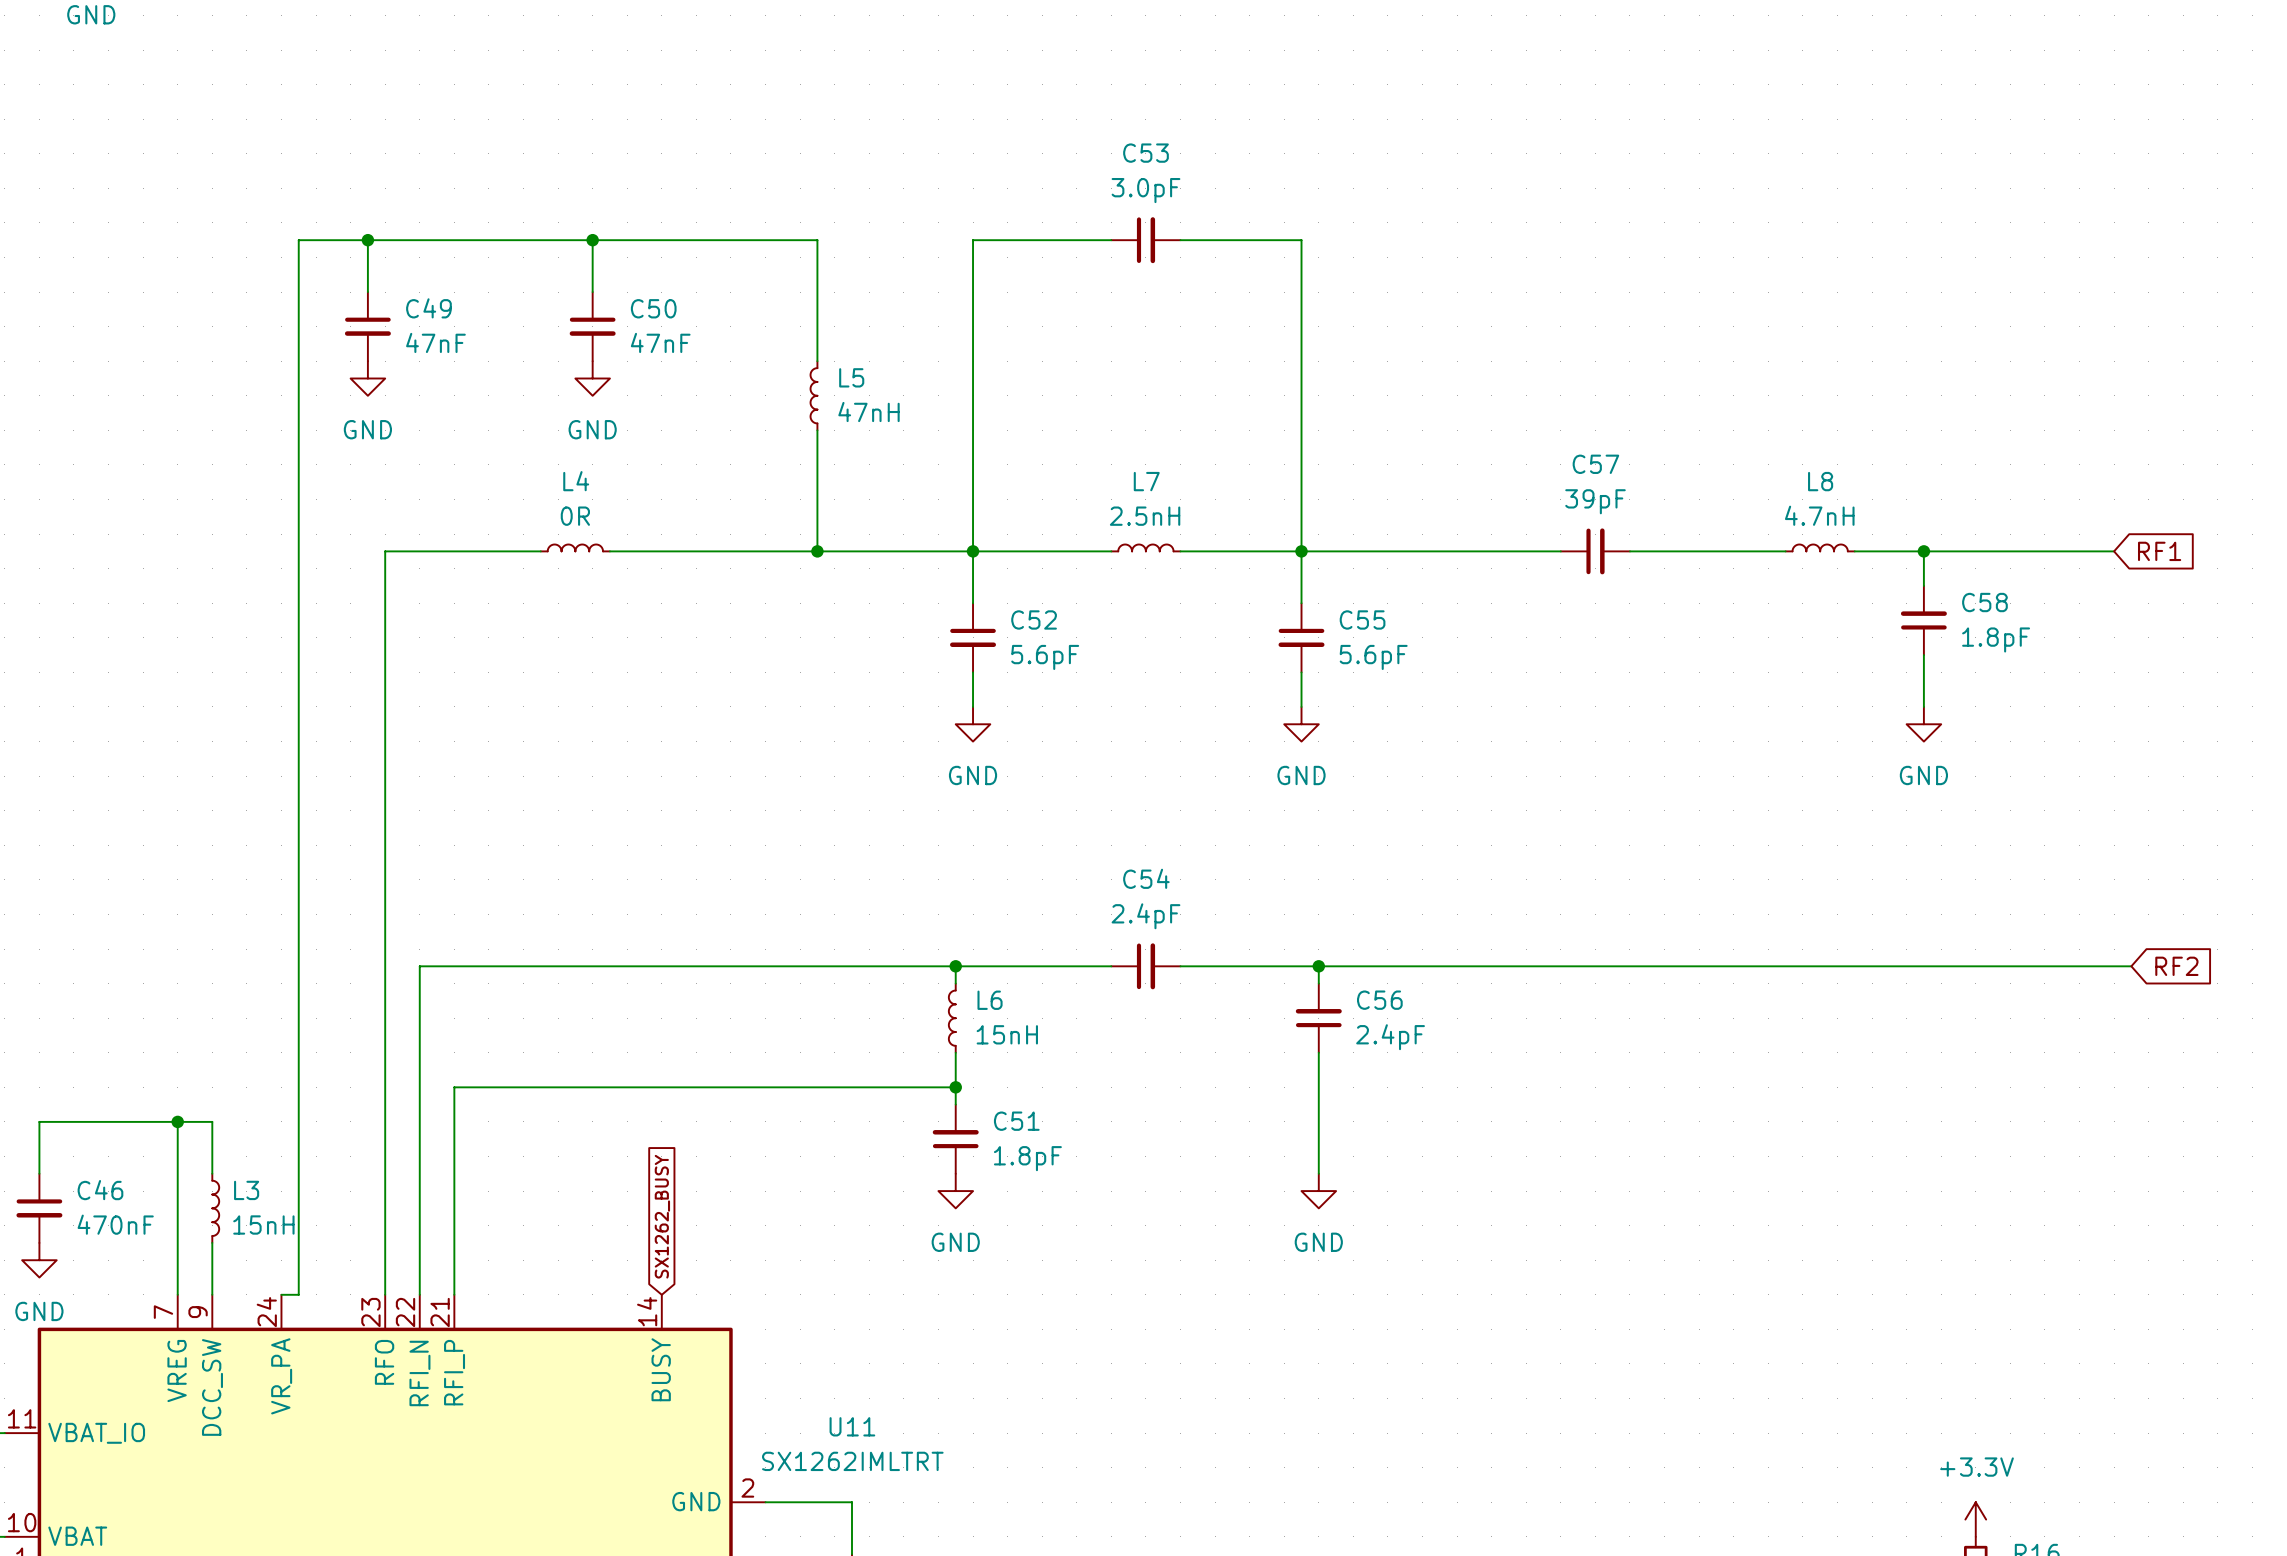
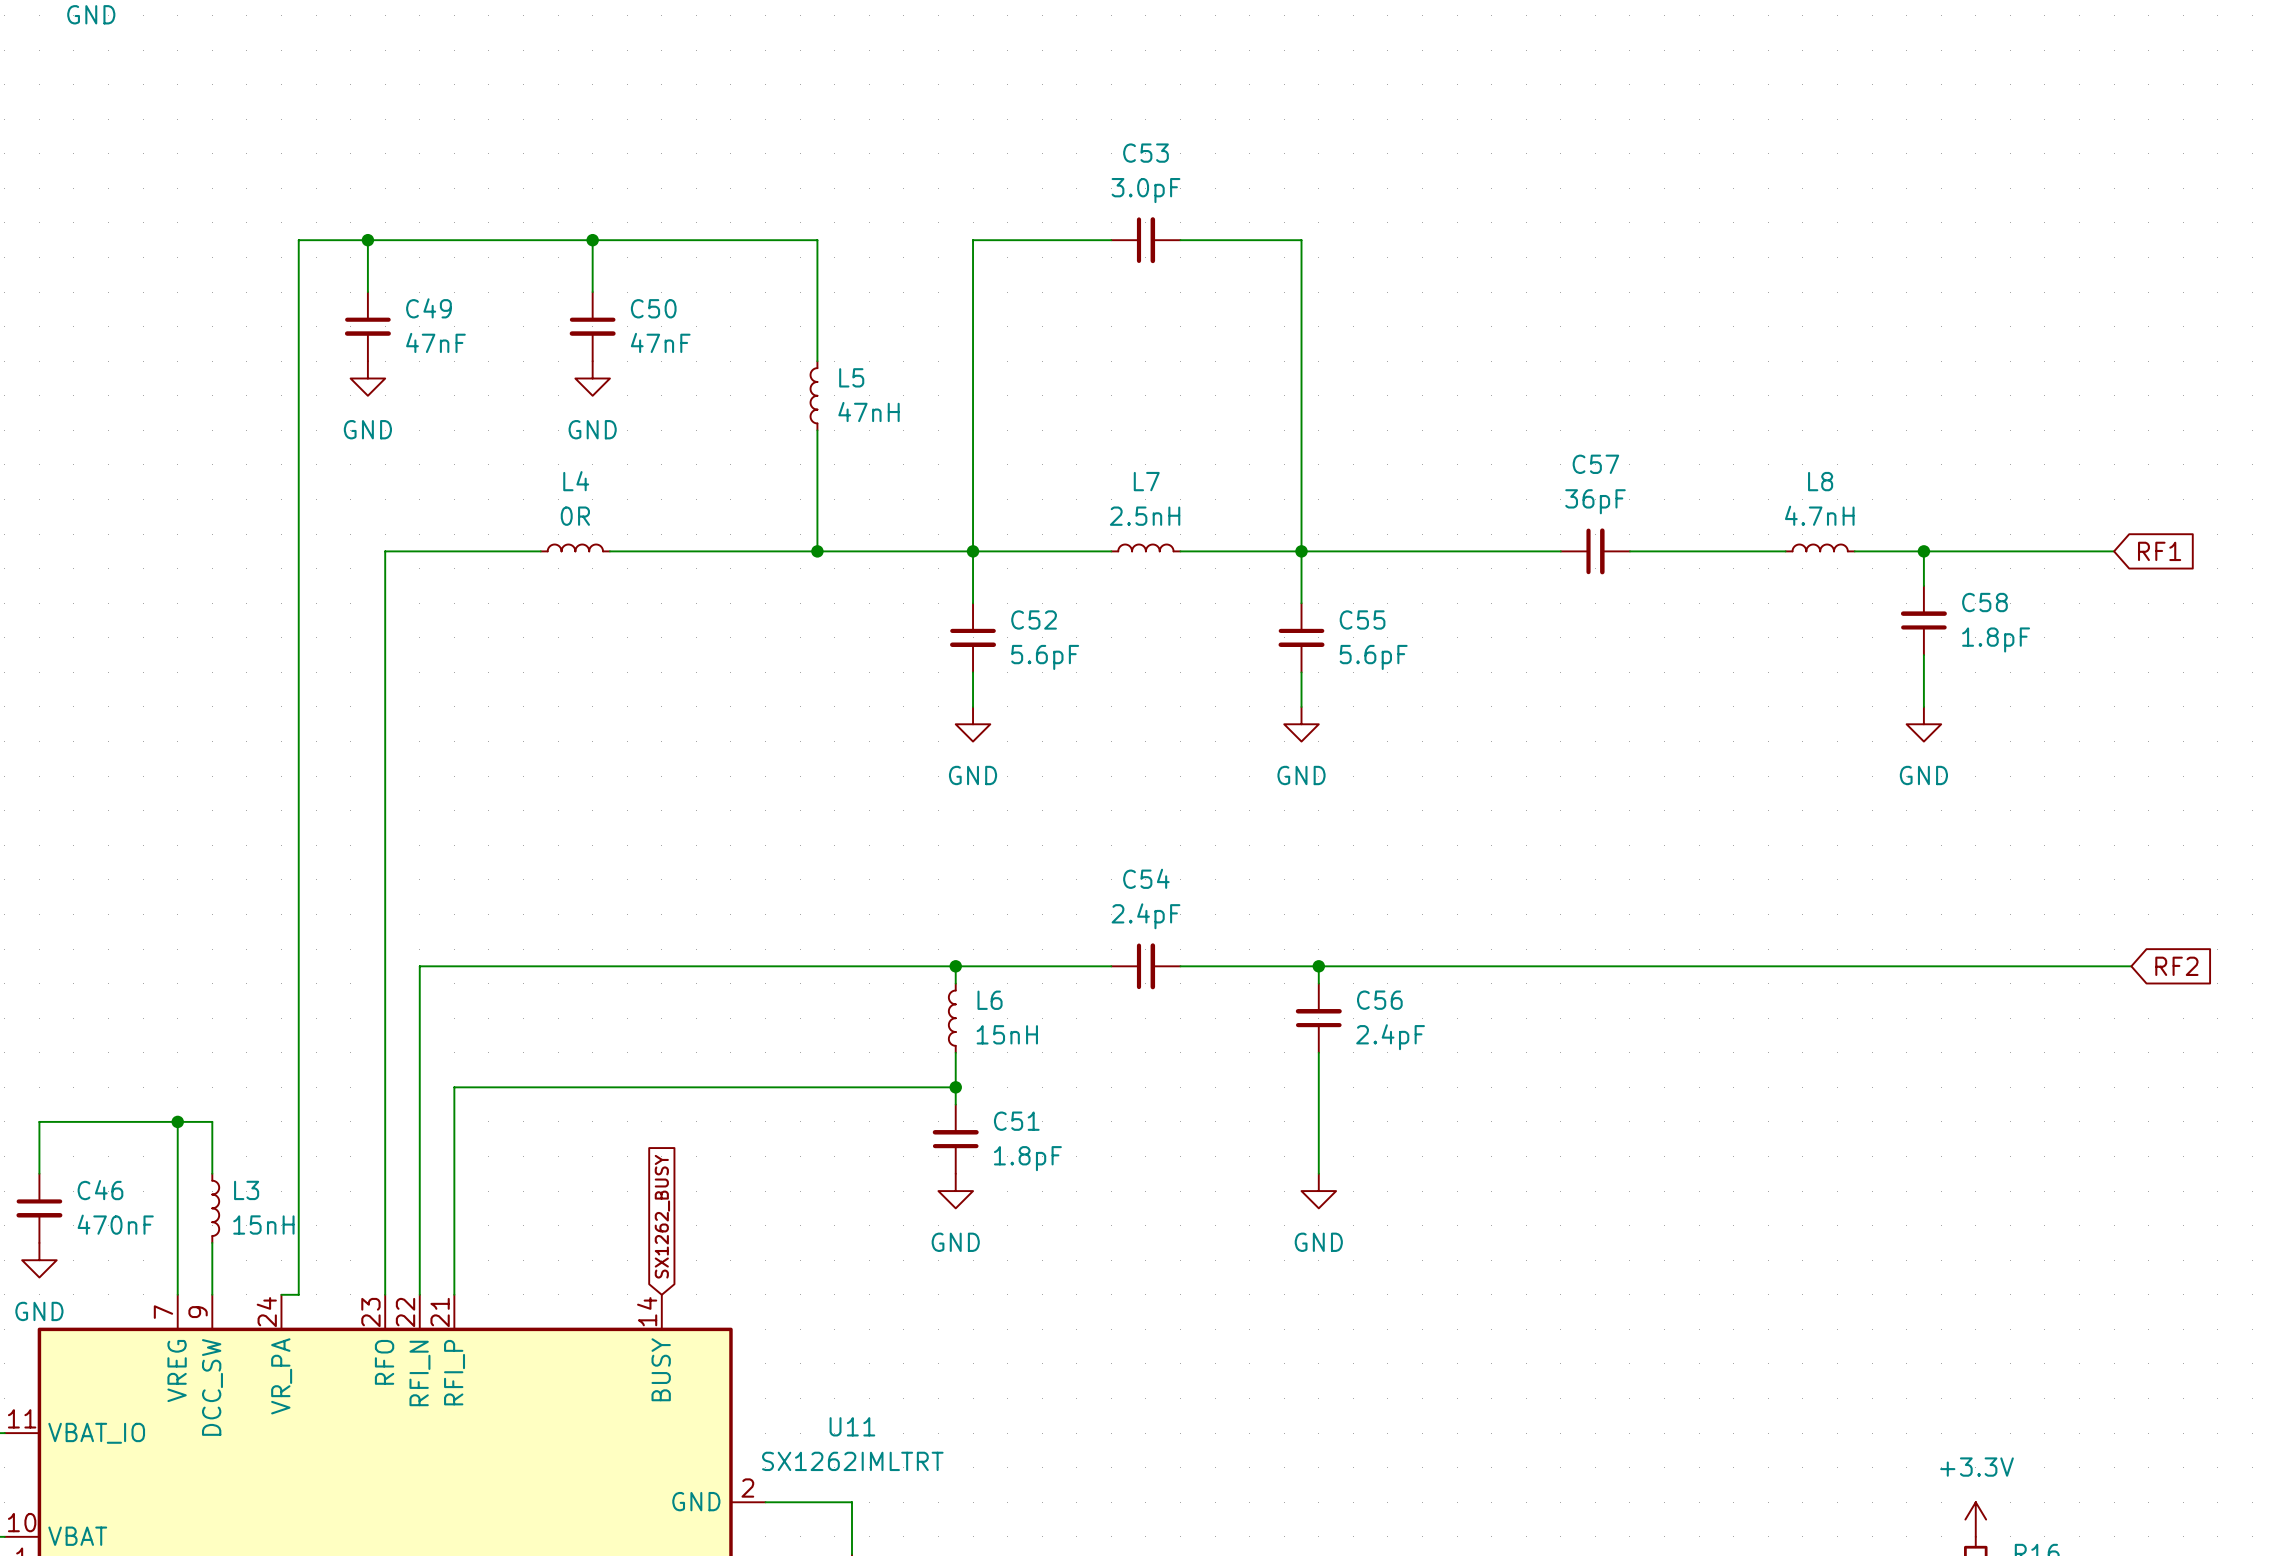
C57 value: 39pF (1595, 501) -> 36pF (1595, 501)

